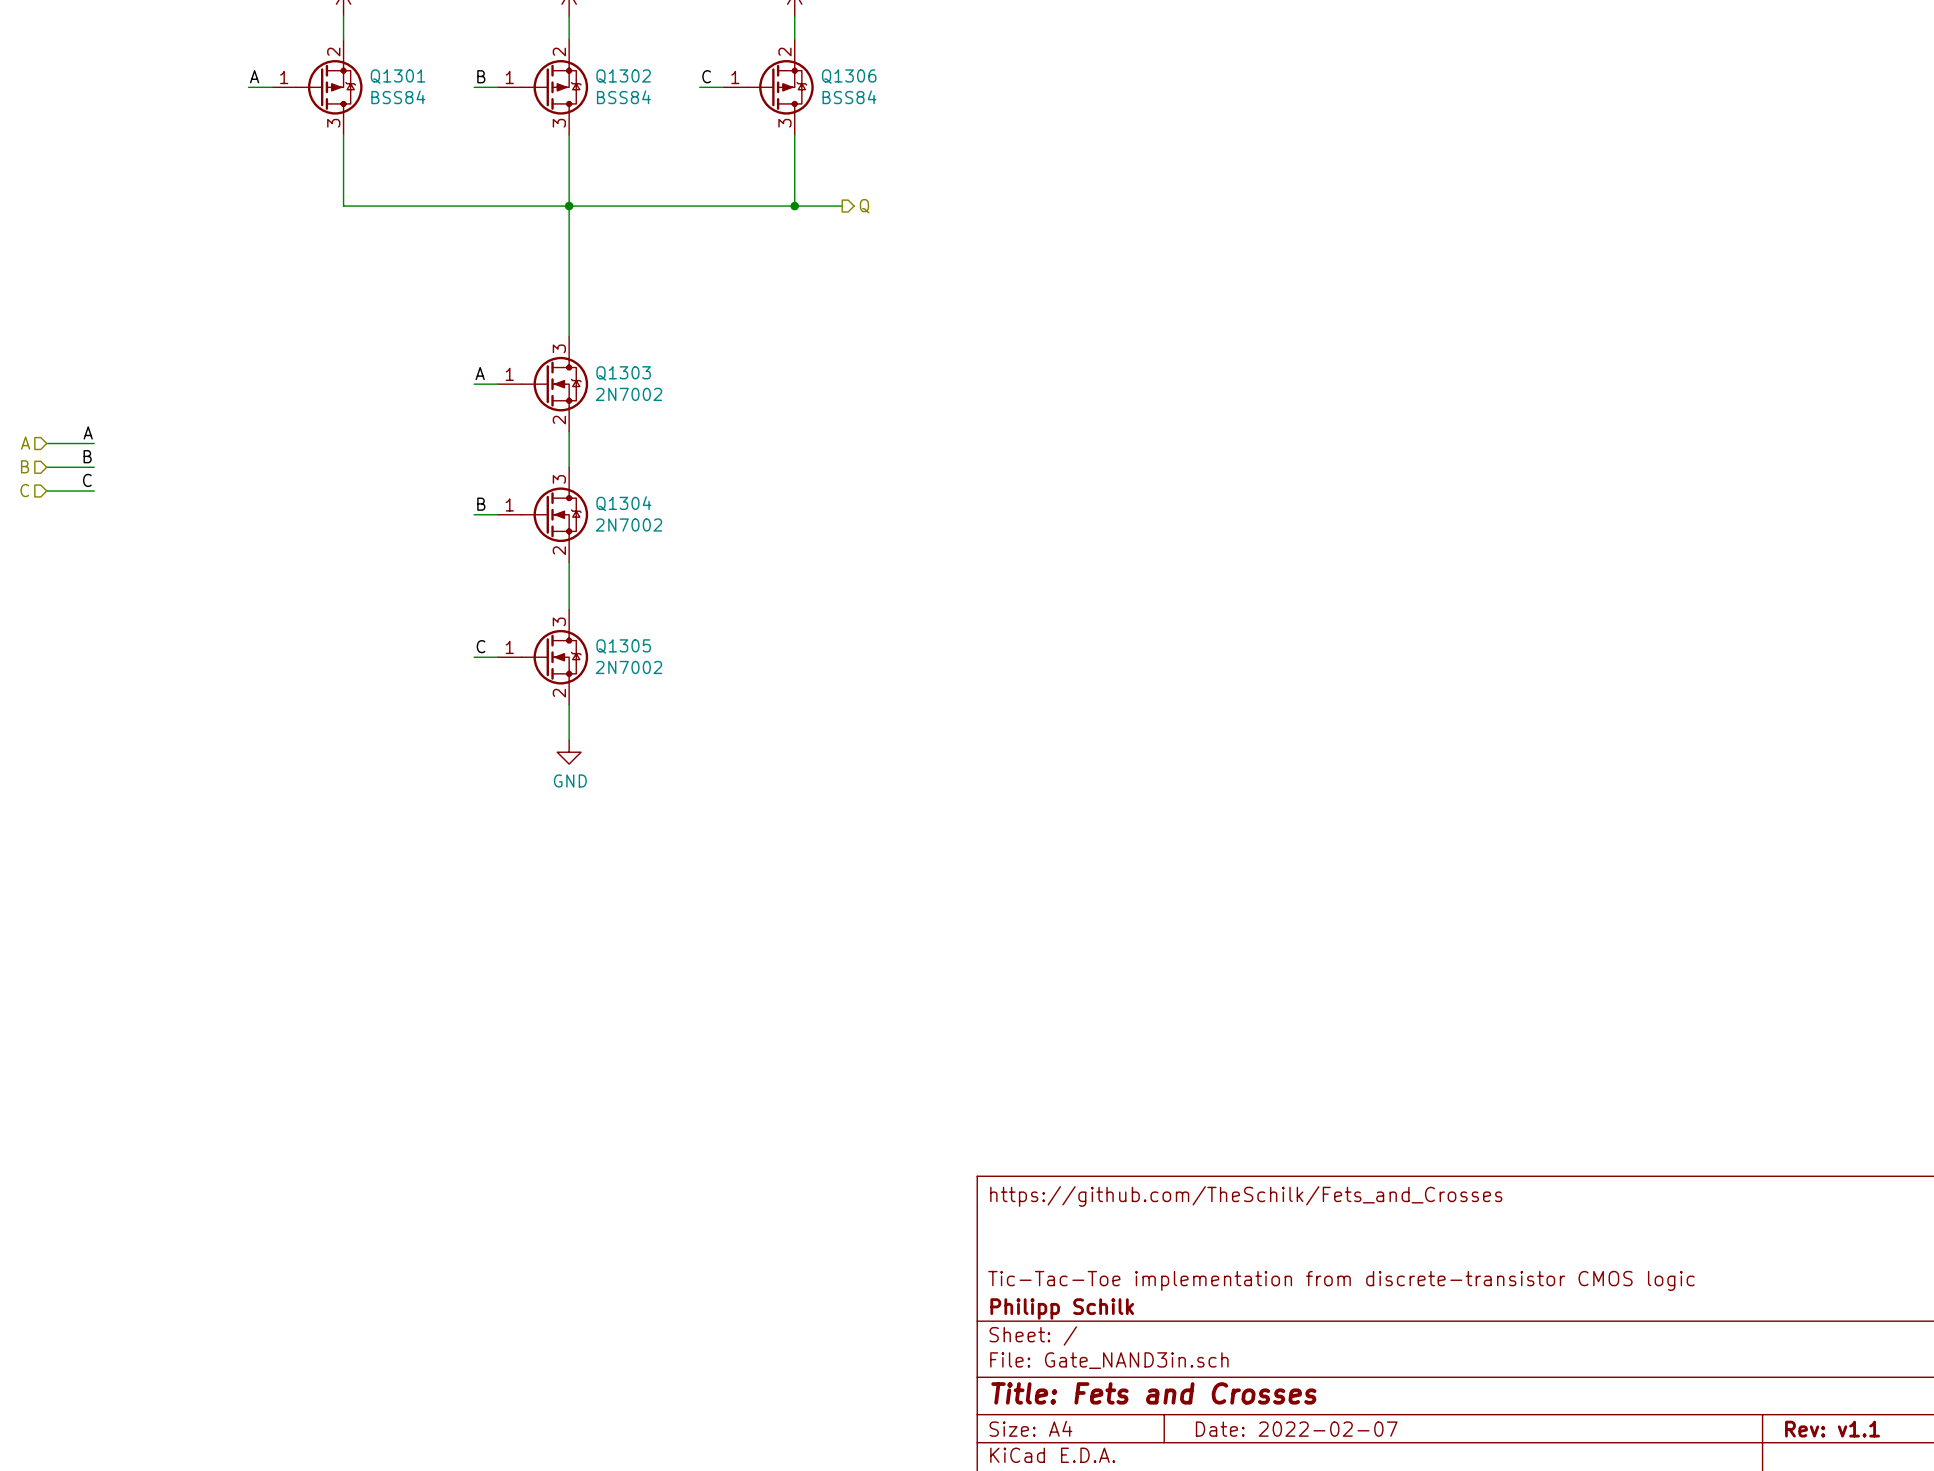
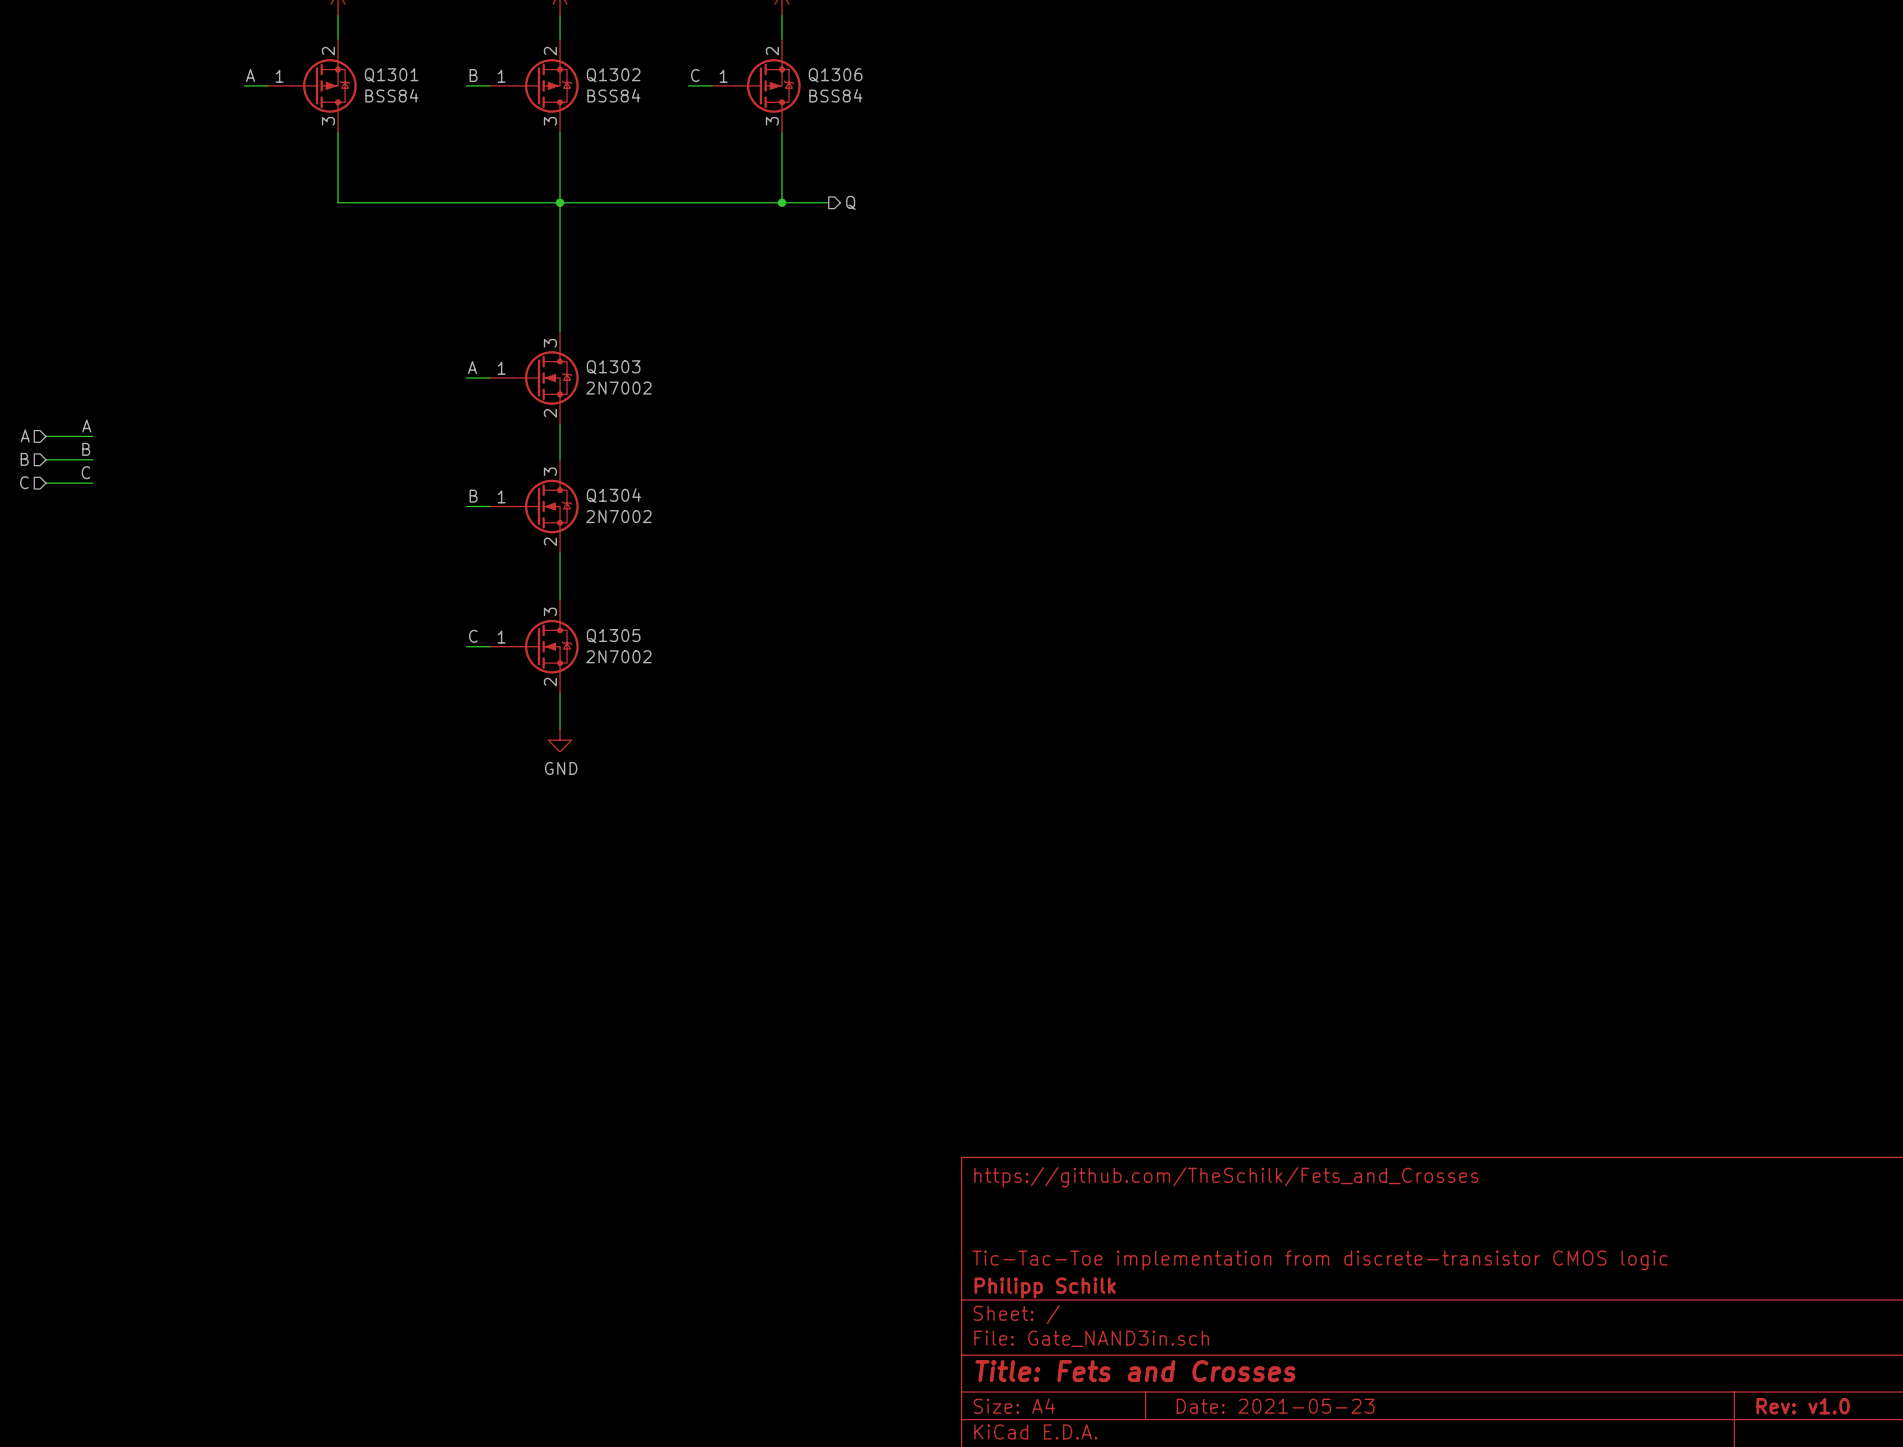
title block: Date: 2022-02-07 (1296, 1429) -> Date: 2021-05-23 (1275, 1406)
title block: Rev: v1.1 (1832, 1429) -> Rev: v1.0 (1803, 1406)

